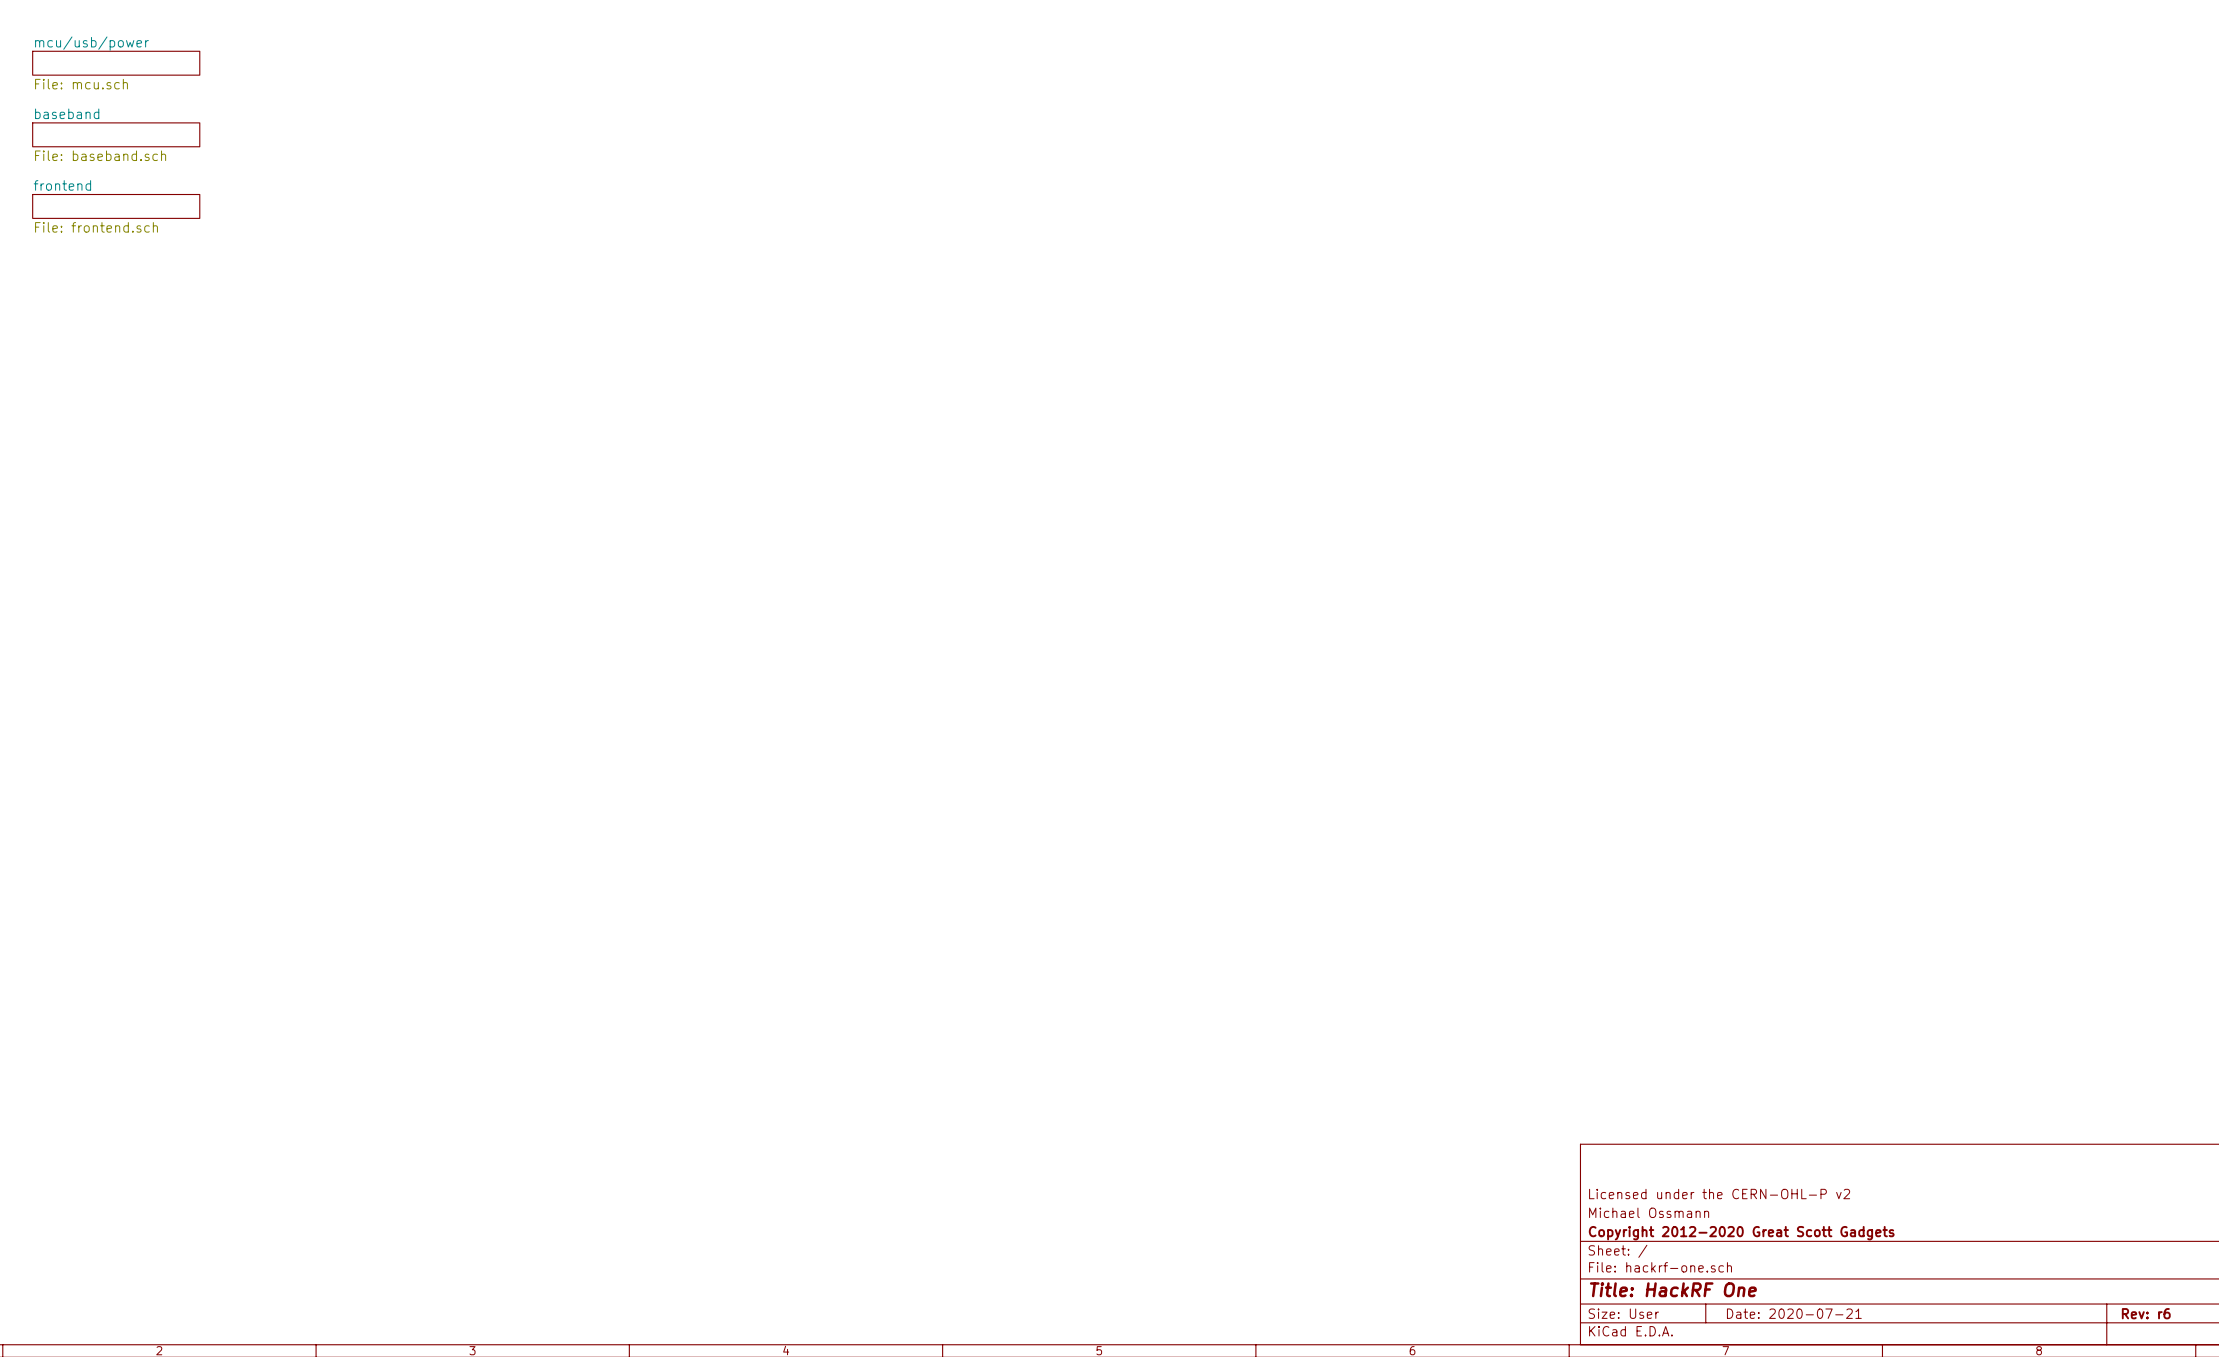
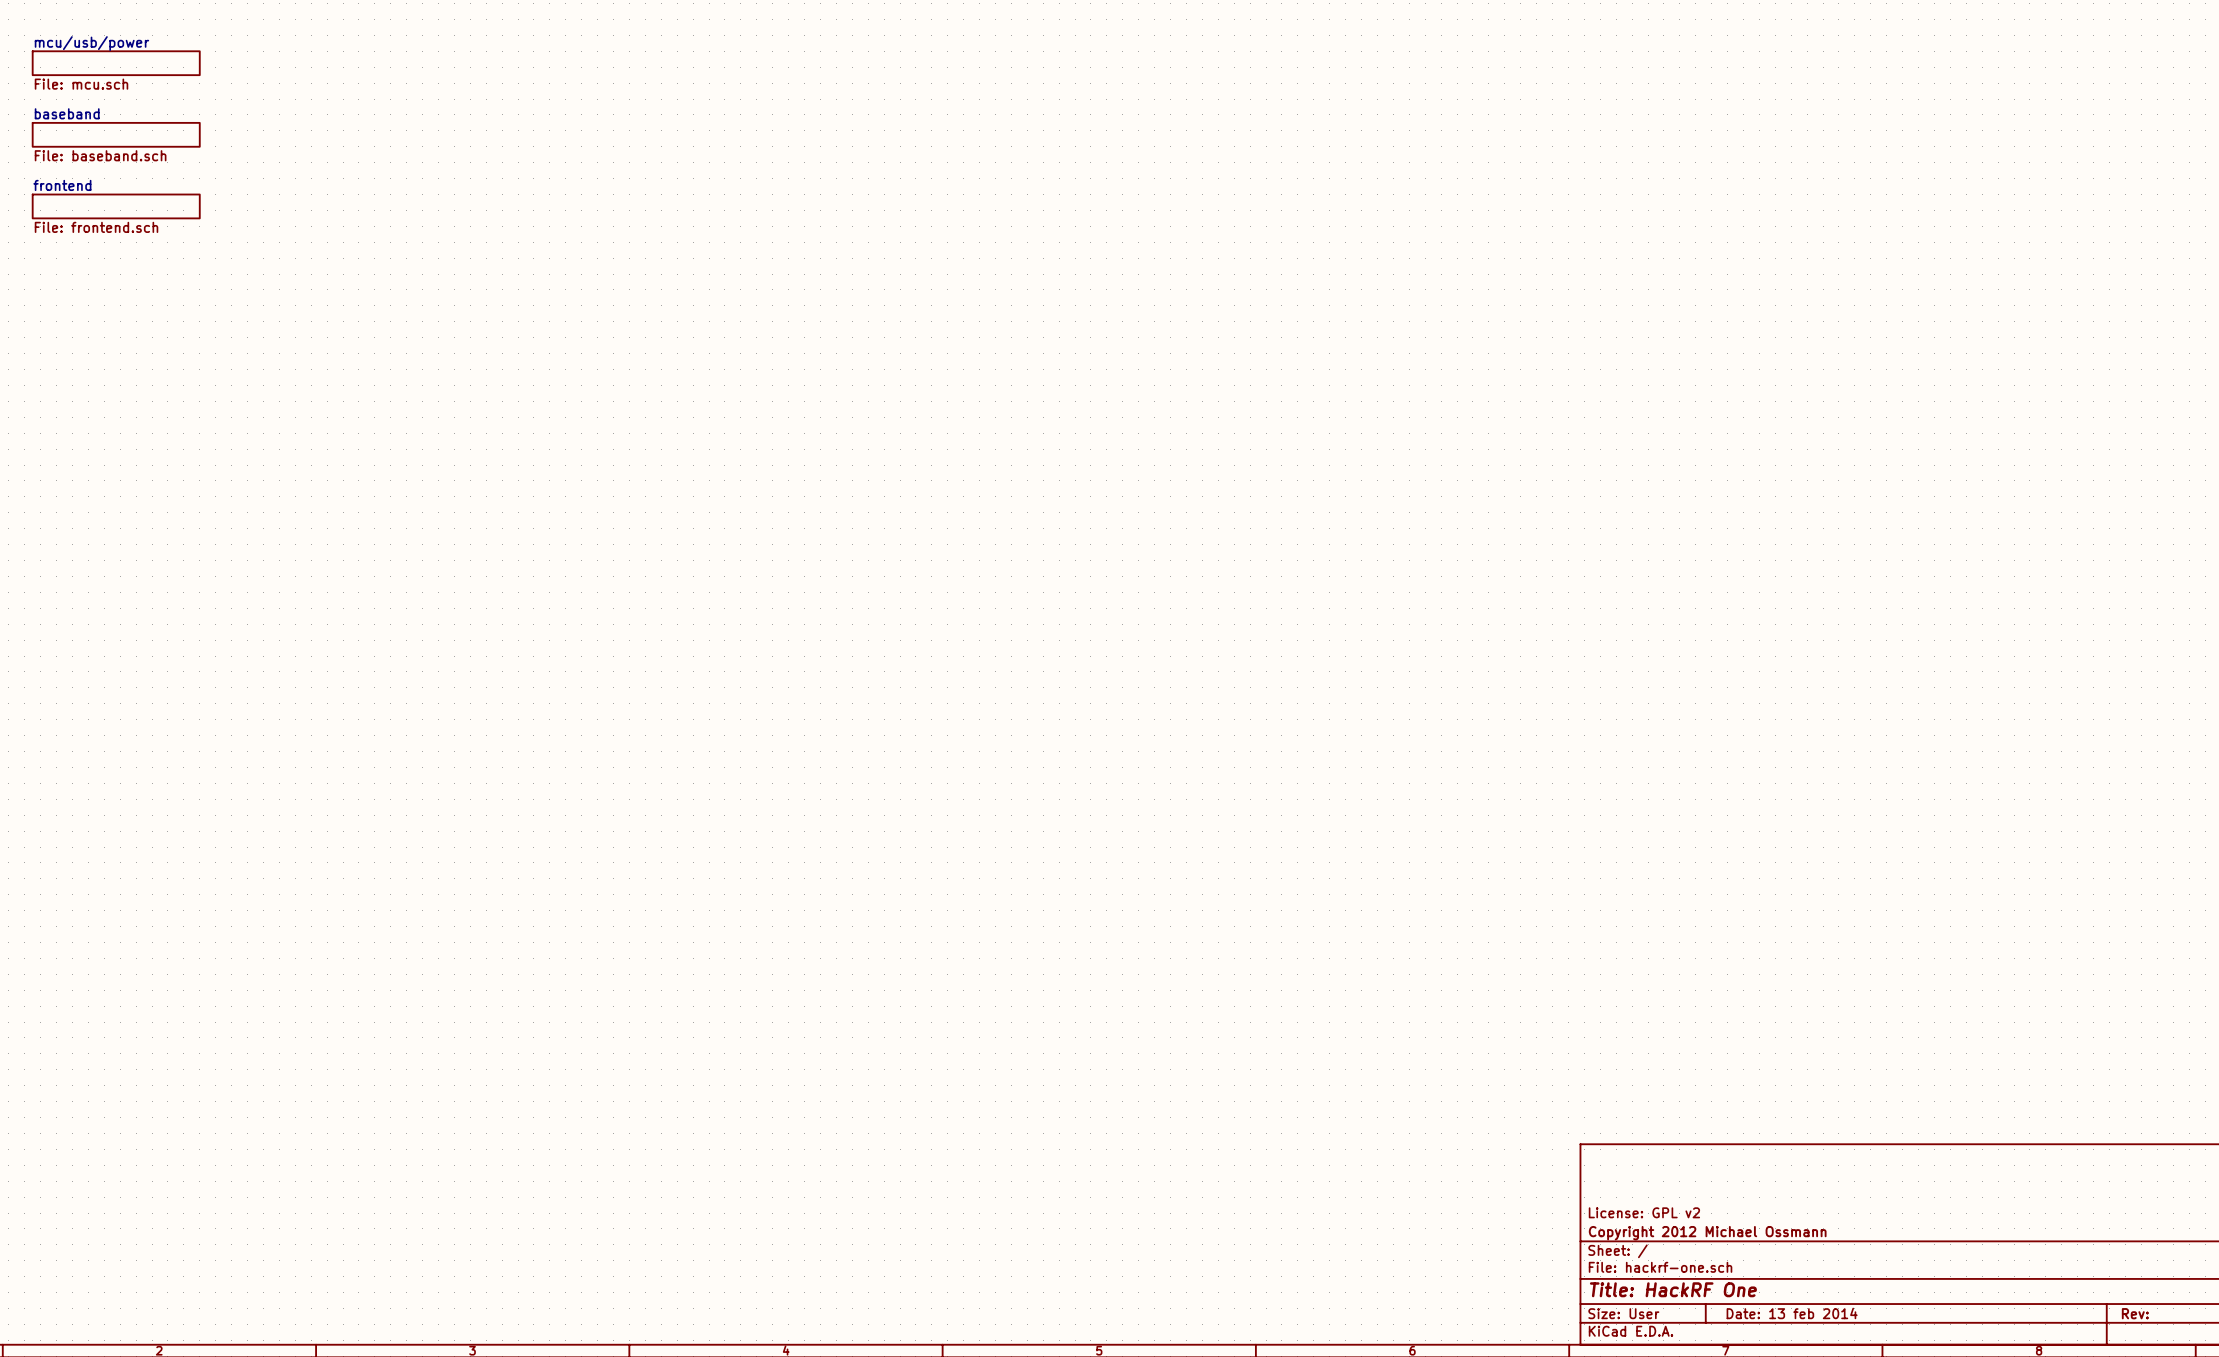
title block: Licensed under the CERN-OHL-P v2 (1719, 1194) -> none
title block: Michael Ossmann (1649, 1212) -> License: GPL v2 (1644, 1212)
title block: Copyright 2012-2020 Great Scott Gadgets (1741, 1233) -> Copyright 2012 Michael Ossmann (1707, 1233)
title block: Date: 2020-07-21 (1794, 1313) -> Date: 13 feb 2014 (1792, 1313)
title block: Rev: r6 (2146, 1313) -> Rev: (2135, 1313)

